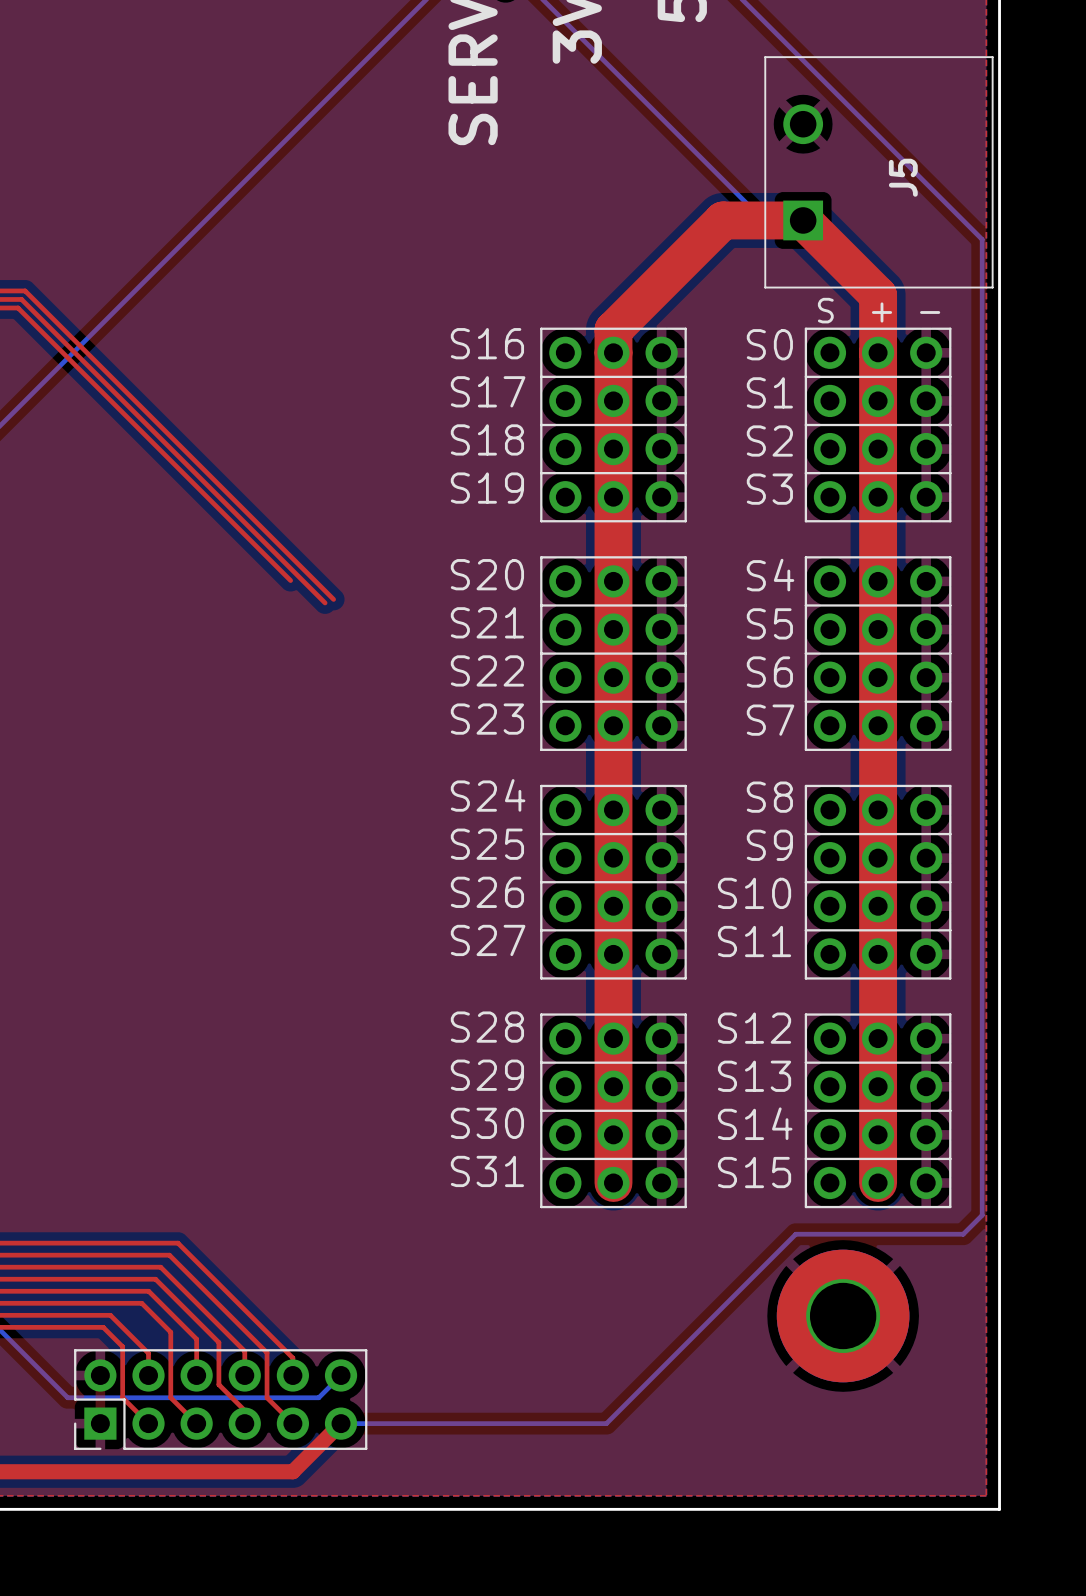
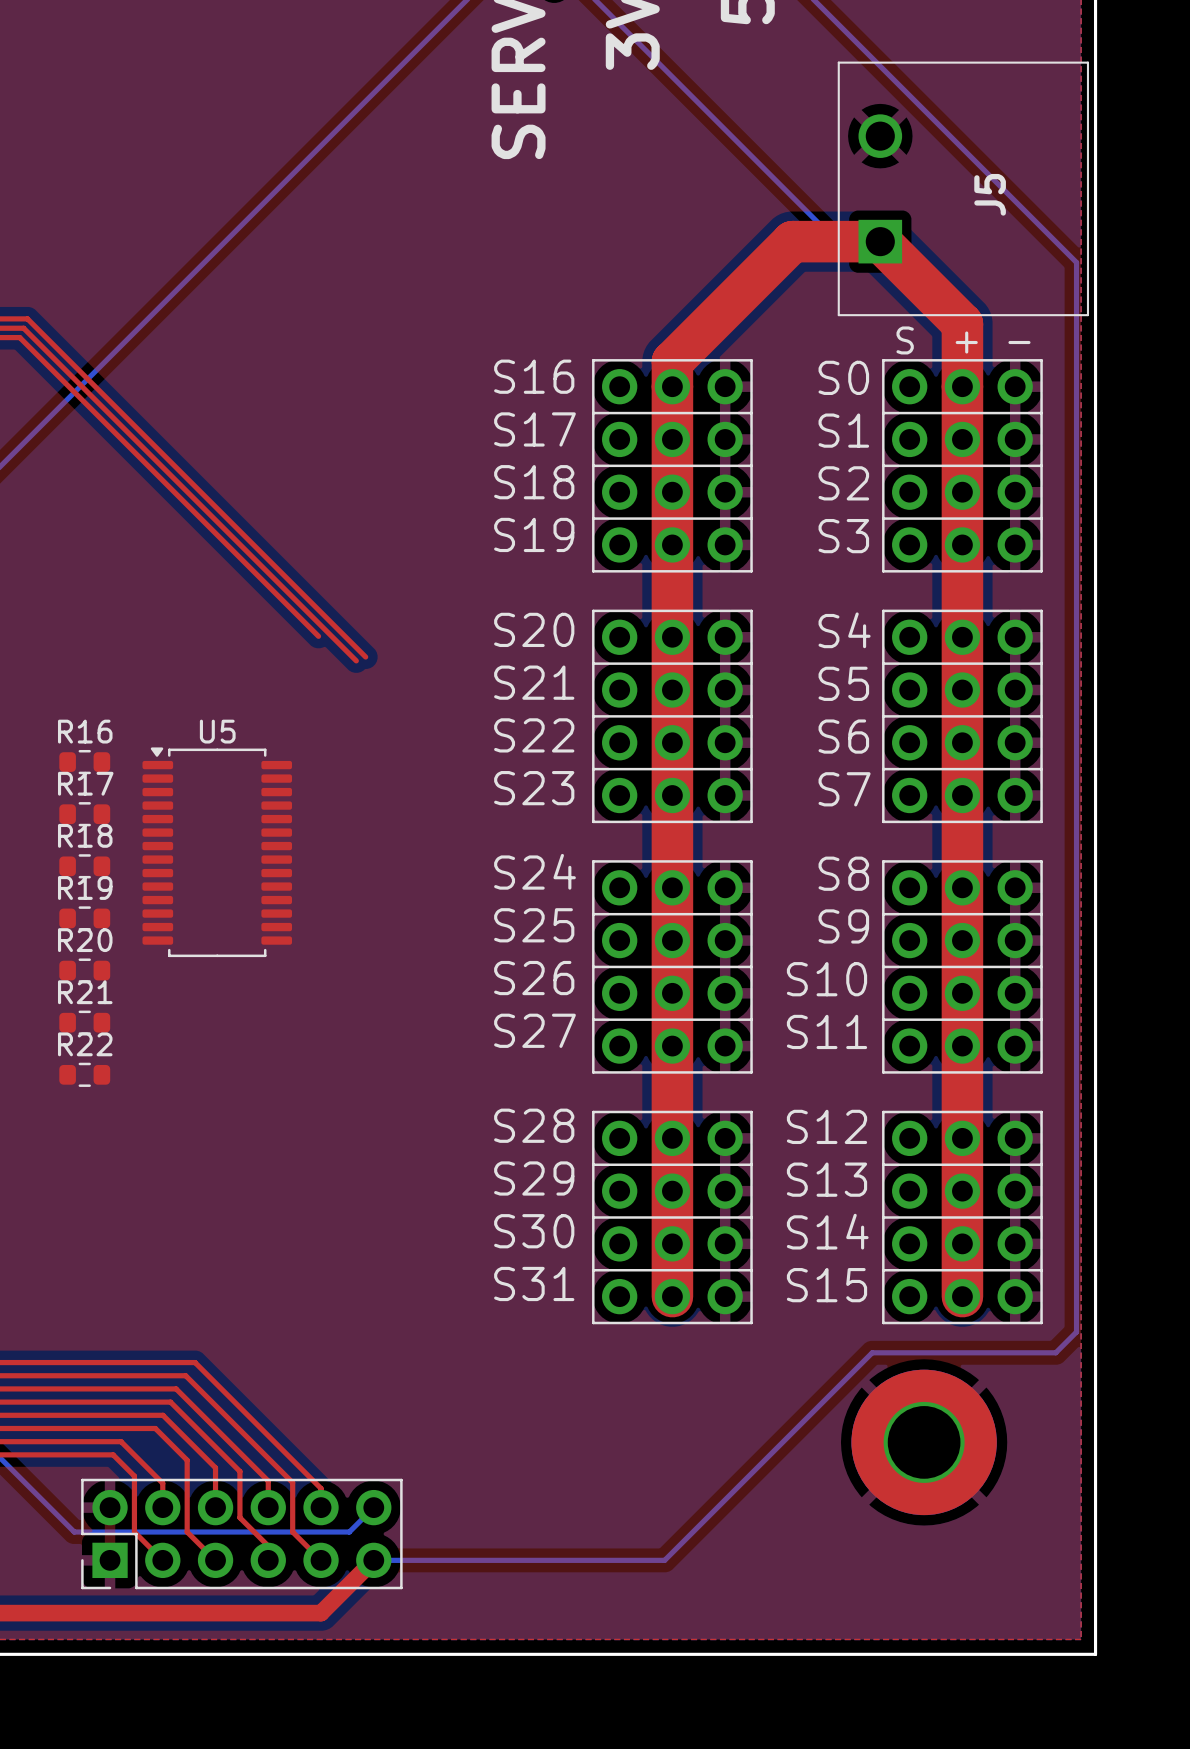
R16: none -> (84, 762)
R17: none -> (84, 814)
U5: none -> (217, 852)
R18: none -> (84, 866)
R19: none -> (84, 918)
R20: none -> (84, 970)
R21: none -> (84, 1022)
R22: none -> (84, 1074)

